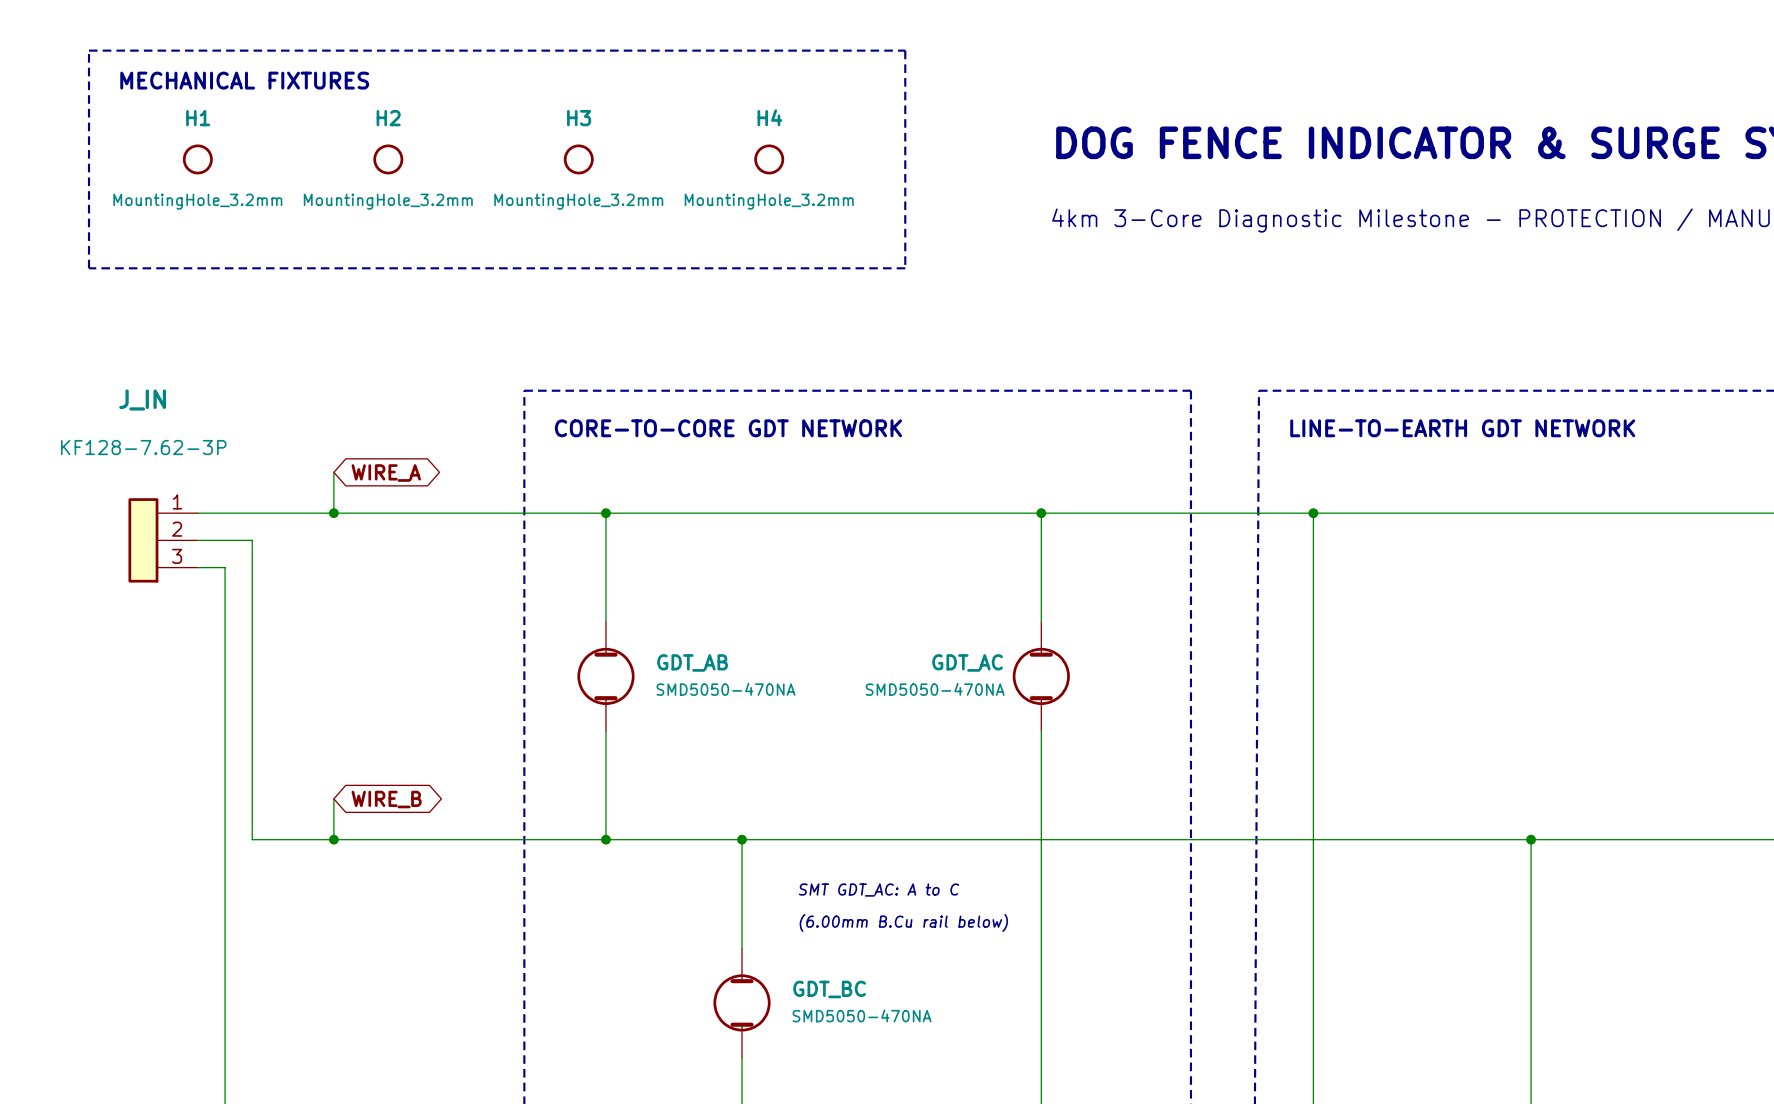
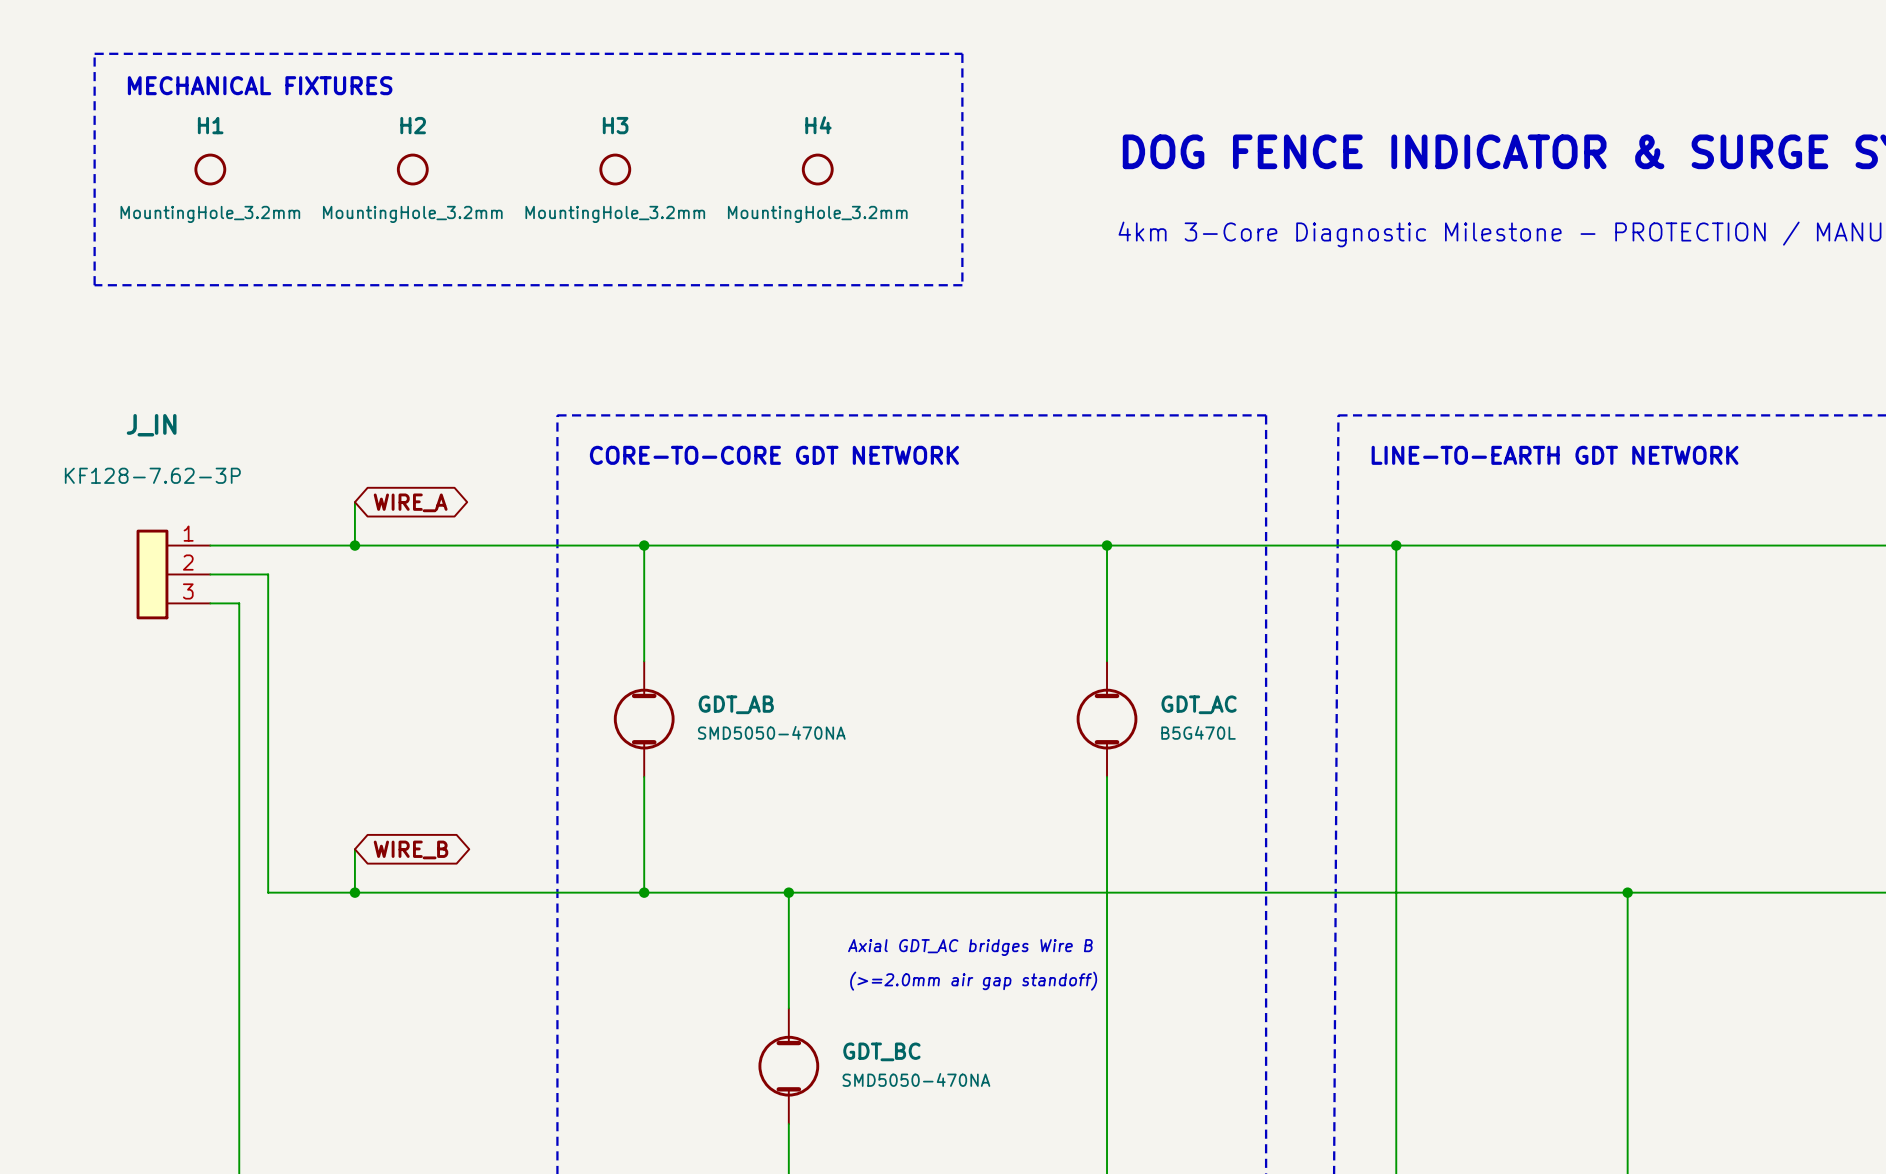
GDT_AC name position: GDT_AC (967, 662) -> GDT_AC (1199, 704)
GDT_AC value: SMD5050-470NA (935, 689) -> B5G470L (1198, 732)
text: SMT GDT_AC: A to C (878, 890) -> Axial GDT_AC bridges Wire B (970, 947)
text: (6.00mm B.Cu rail below) (903, 922) -> (>=2.0mm air gap standoff) (973, 981)

